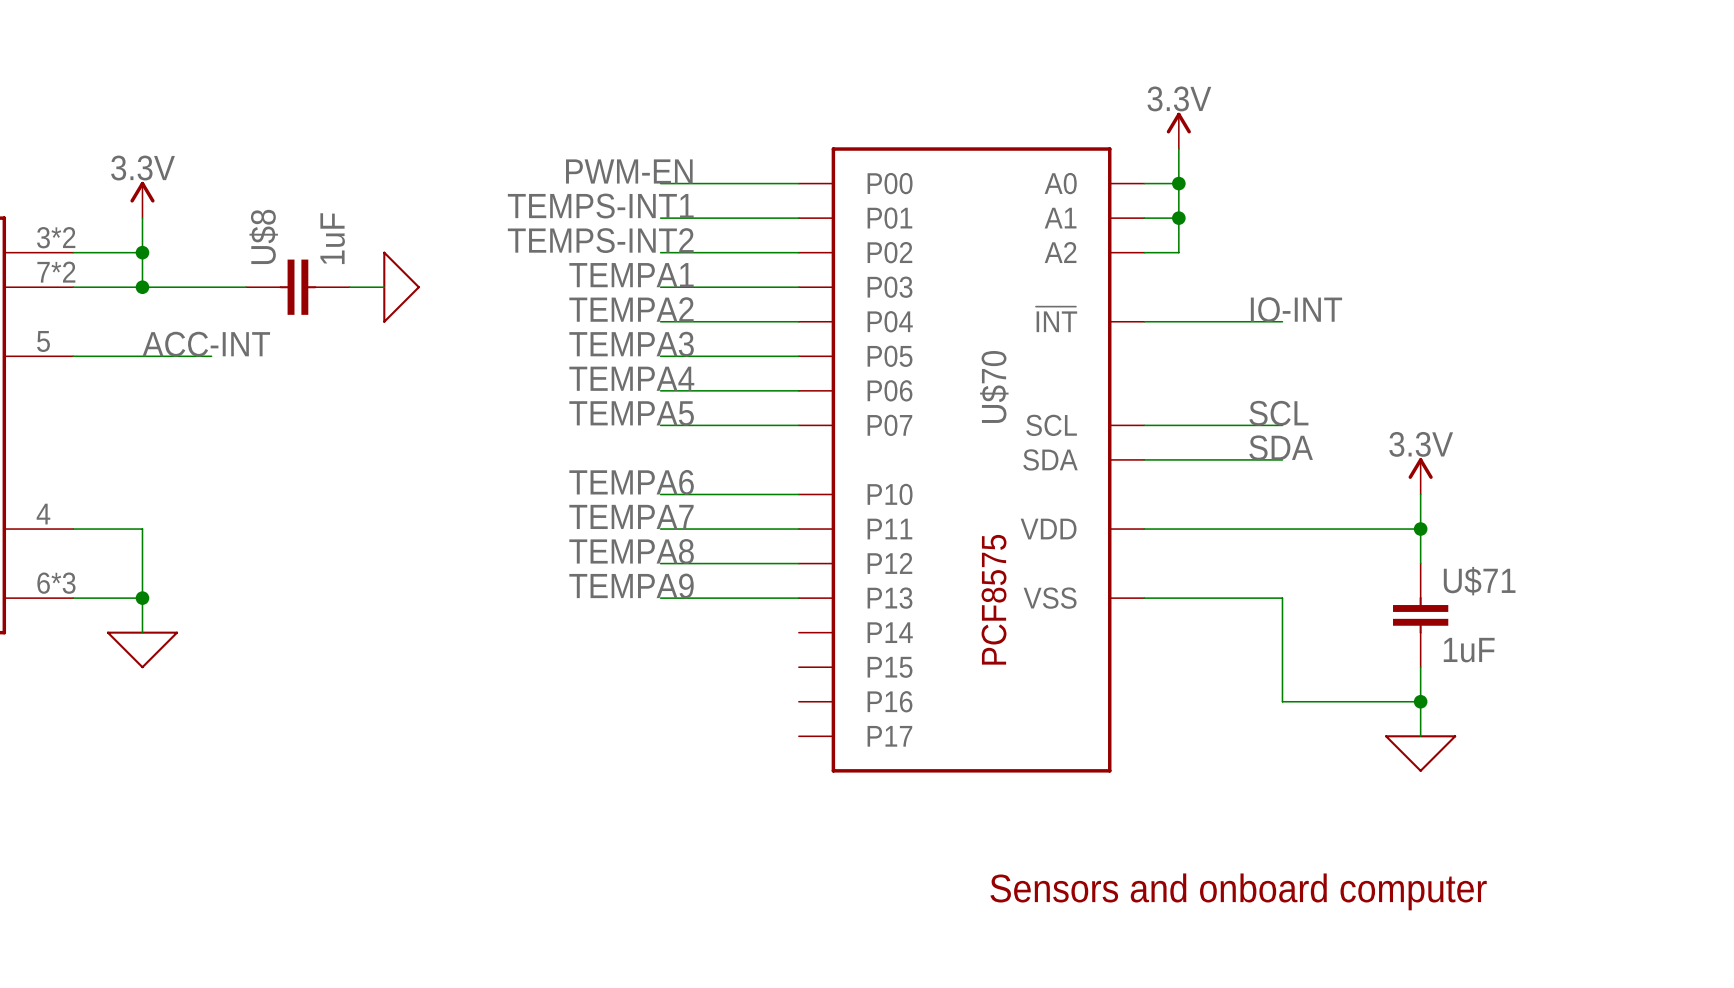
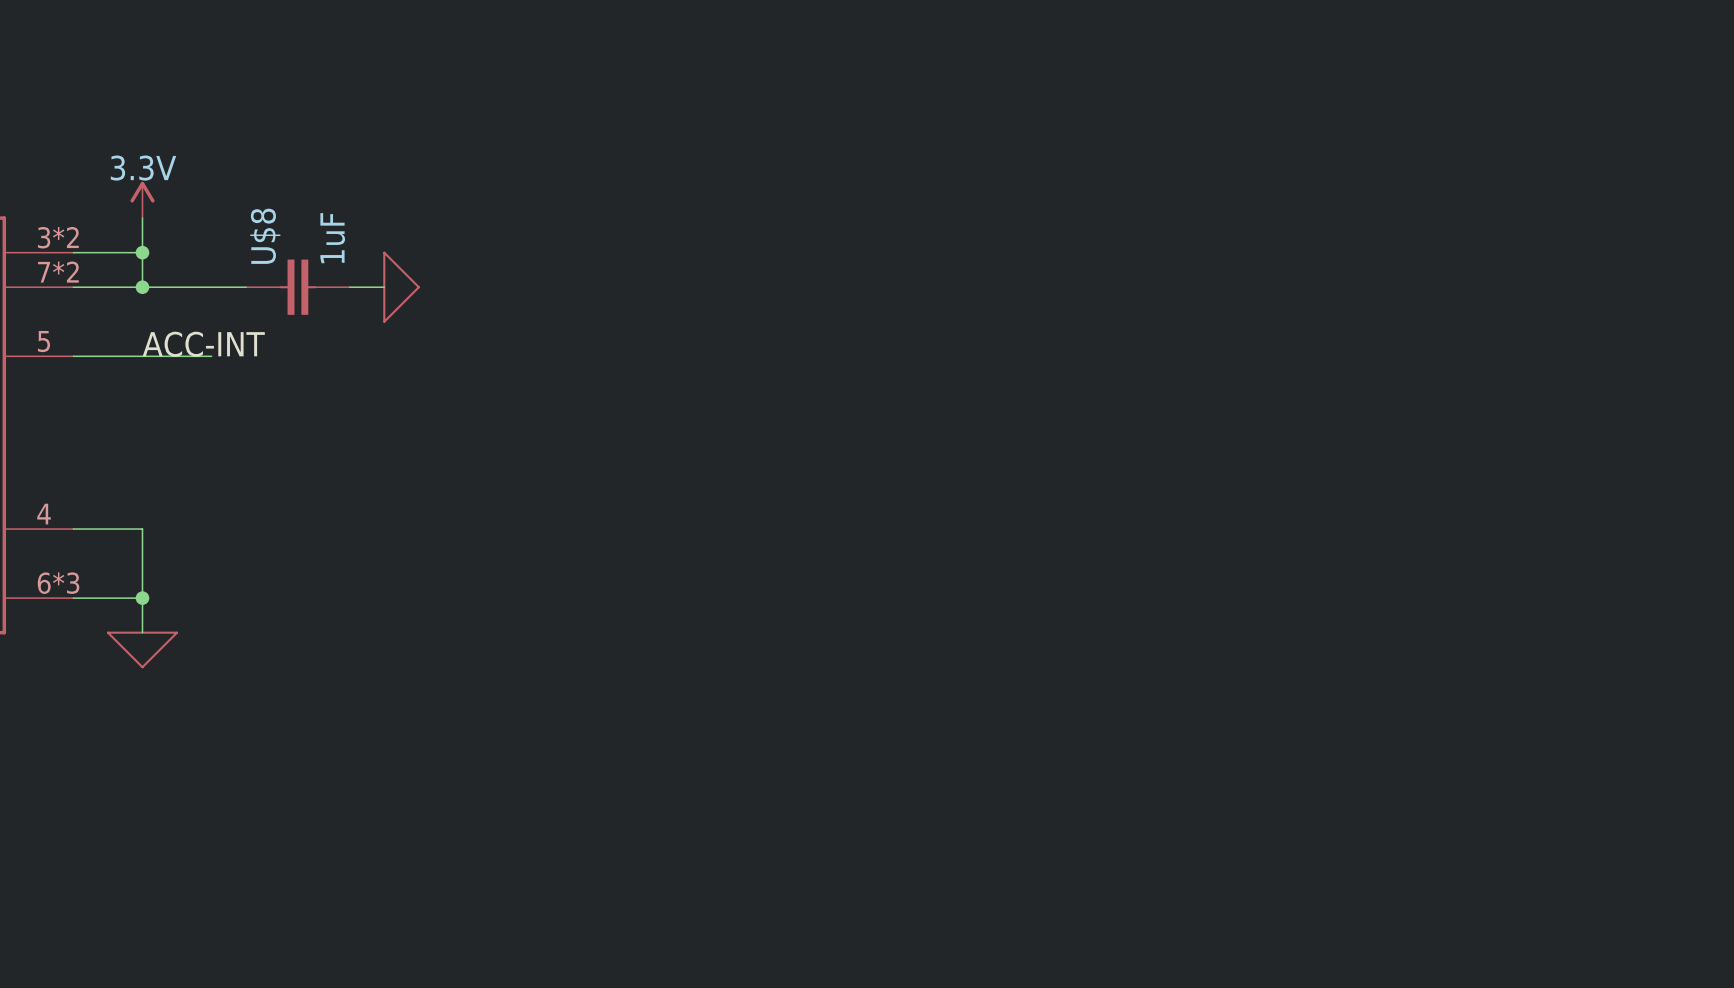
power symbol: 3.3V (1178, 130) -> none
wire: (1178, 149) (1178, 252) (1144, 252) -> none
label: PWM-EN (629, 171) -> none
wire: (660, 183) (798, 183) -> none
wire: (1144, 183) (1178, 183) -> none
junction: (1178, 183) -> none
label: TEMPS-INT1 (600, 206) -> none
wire: (660, 218) (798, 218) -> none
wire: (1144, 218) (1178, 218) -> none
junction: (1178, 218) -> none
label: TEMPS-INT2 (600, 240) -> none
wire: (660, 252) (798, 252) -> none
label: TEMPA1 (631, 275) -> none
wire: (660, 287) (798, 287) -> none
label: TEMPA2 (631, 309) -> none
label: IO-INT (1296, 309) -> none
wire: (660, 321) (798, 321) -> none
wire: (1144, 321) (1282, 321) -> none
label: TEMPA3 (631, 344) -> none
wire: (660, 356) (798, 356) -> none
label: TEMPA4 (631, 378) -> none
wire: (660, 390) (798, 390) -> none
label: TEMPA5 (631, 413) -> none
label: SCL (1278, 413) -> none
wire: (660, 425) (798, 425) -> none
wire: (1144, 425) (1282, 425) -> none
label: SDA (1281, 447) -> none
U$70: (971, 459) -> none
wire: (1144, 459) (1282, 459) -> none
power symbol: 3.3V (1420, 476) -> none
label: TEMPA6 (631, 482) -> none
wire: (660, 494) (798, 494) -> none
wire: (1420, 494) (1420, 563) -> none
label: TEMPA7 (631, 516) -> none
wire: (660, 529) (798, 529) -> none
wire: (1144, 529) (1420, 529) -> none
junction: (1420, 529) -> none
label: TEMPA8 (631, 551) -> none
wire: (660, 563) (798, 563) -> none
label: TEMPA9 (631, 586) -> none
wire: (660, 598) (798, 598) -> none
wire: (1144, 598) (1282, 598) (1282, 701) (1420, 701) -> none
U$71: 1uF (1420, 615) -> none
wire: (1420, 667) (1420, 736) -> none
junction: (1420, 701) -> none
power symbol: (1420, 753) -> none
text: Sensors and onboard computer (1238, 891) -> none

